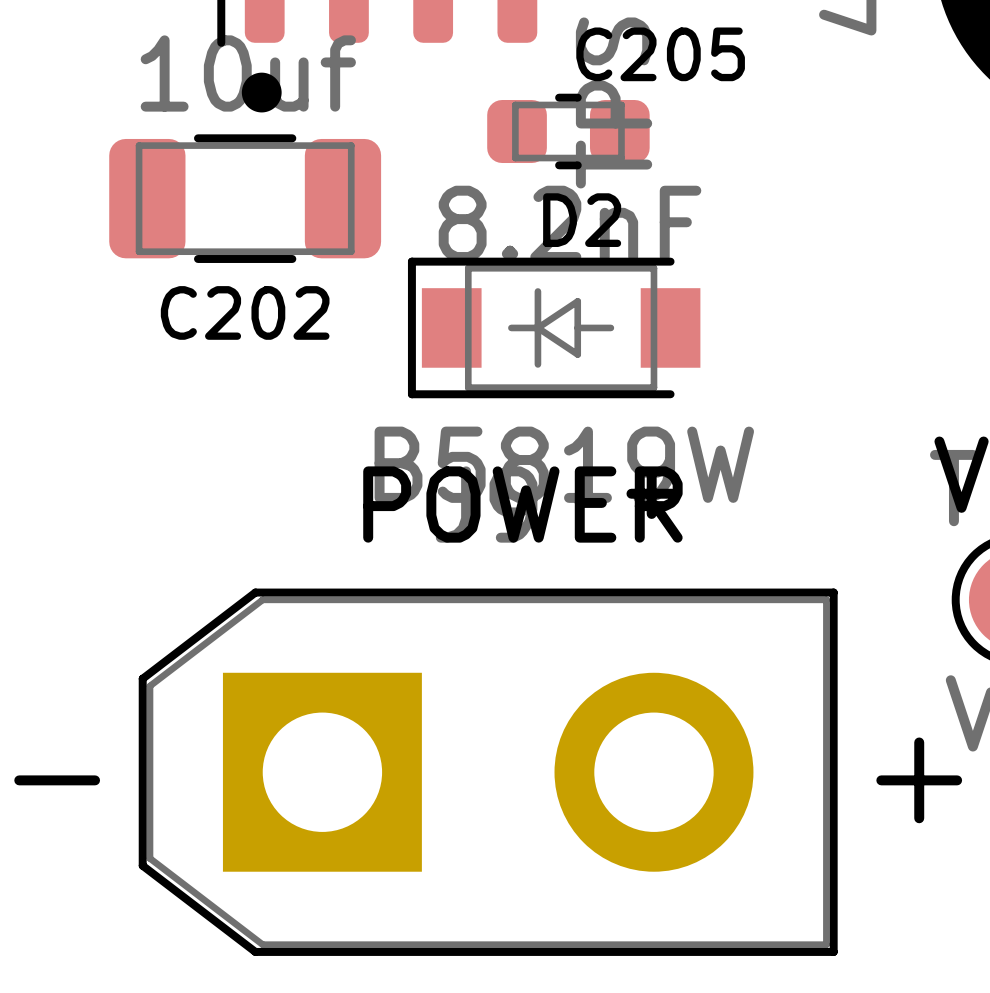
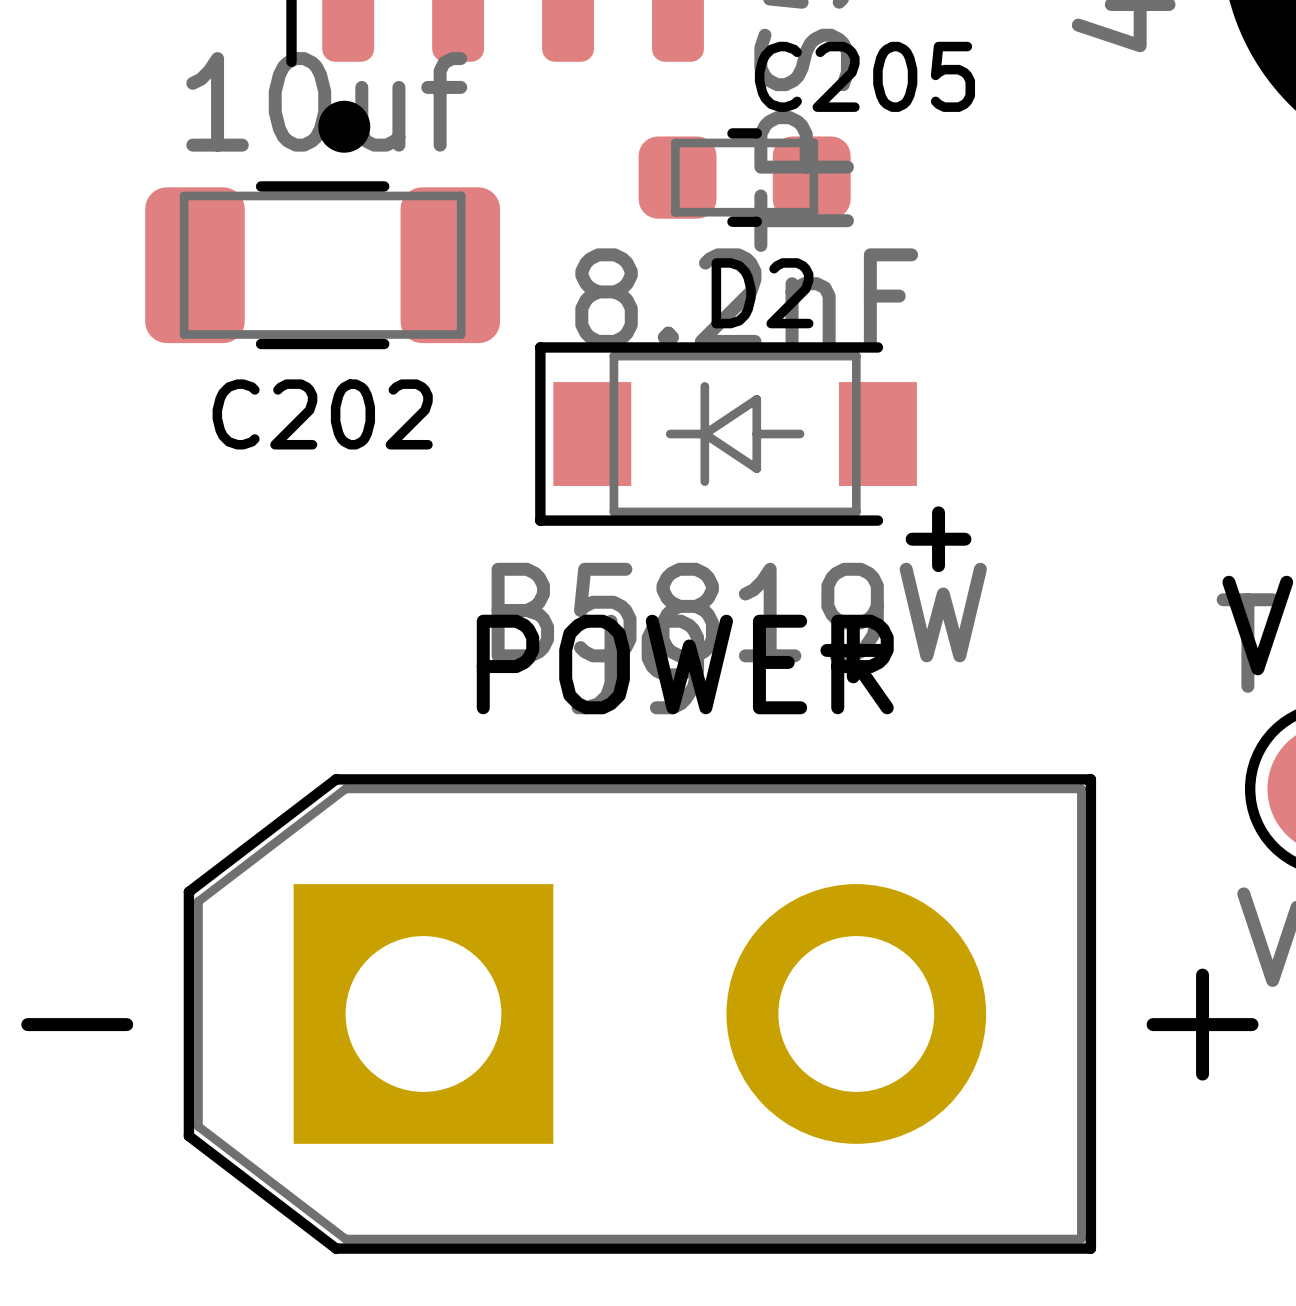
text: none -> + (938, 539)

